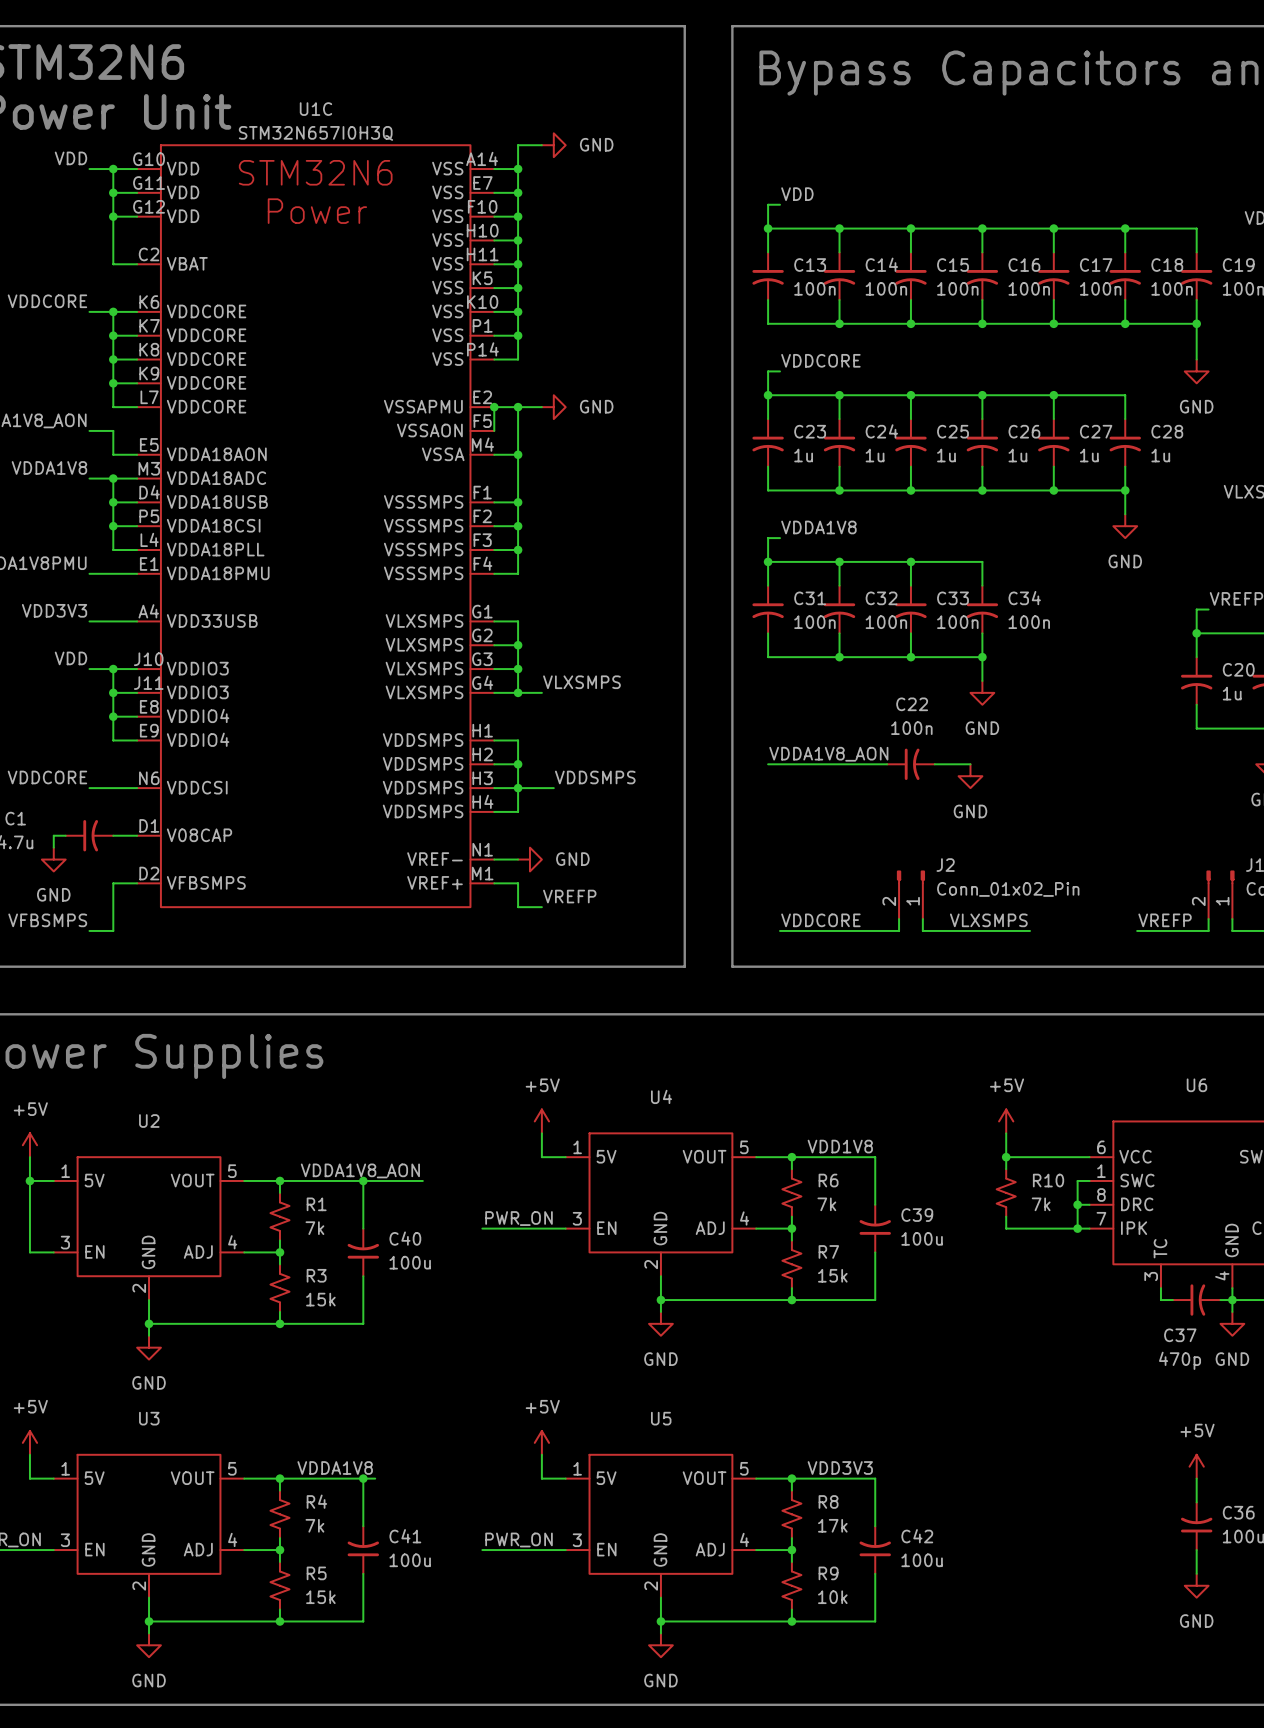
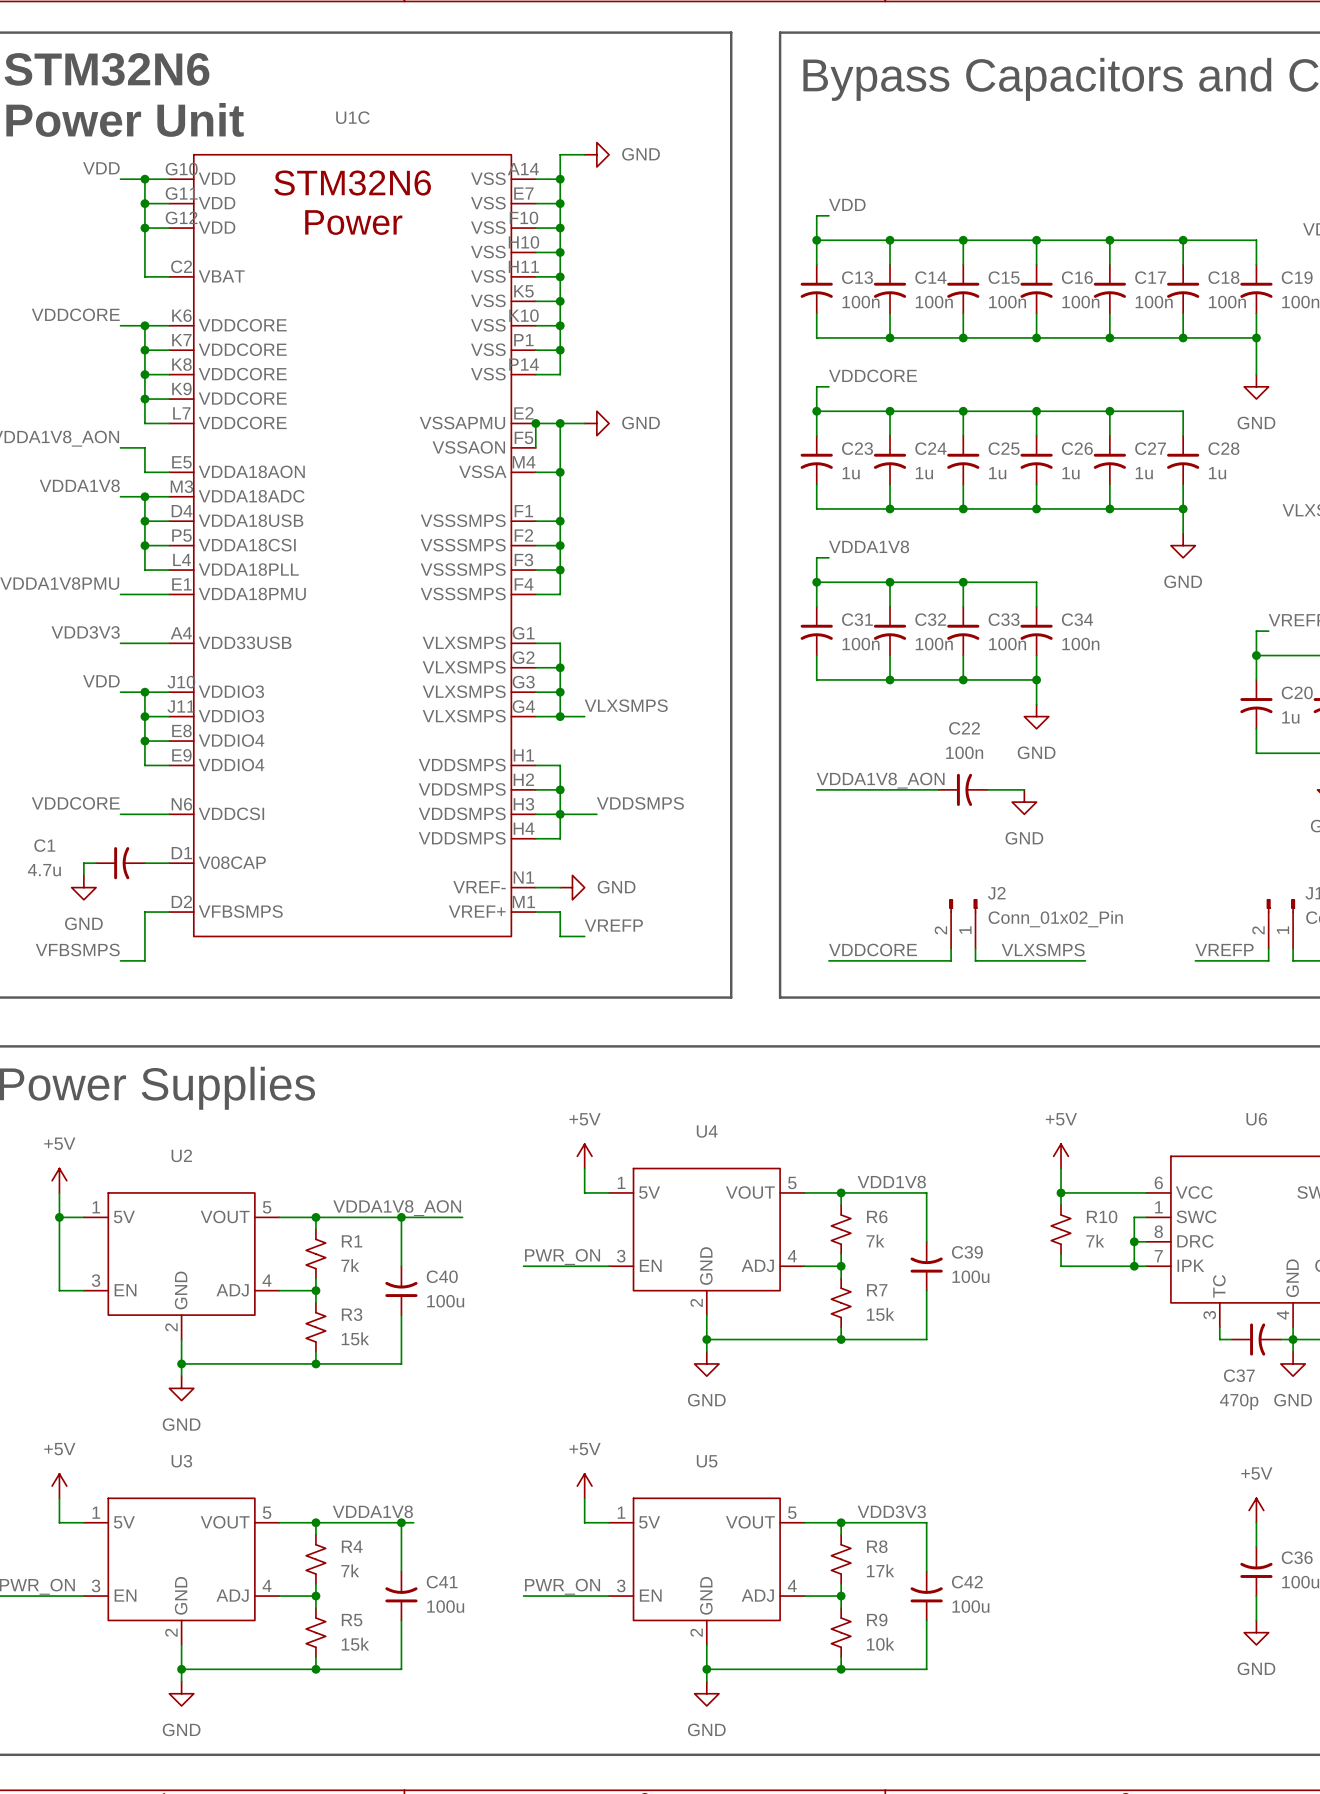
U1C value: STM32N657I0H3Q (315, 133) -> none

